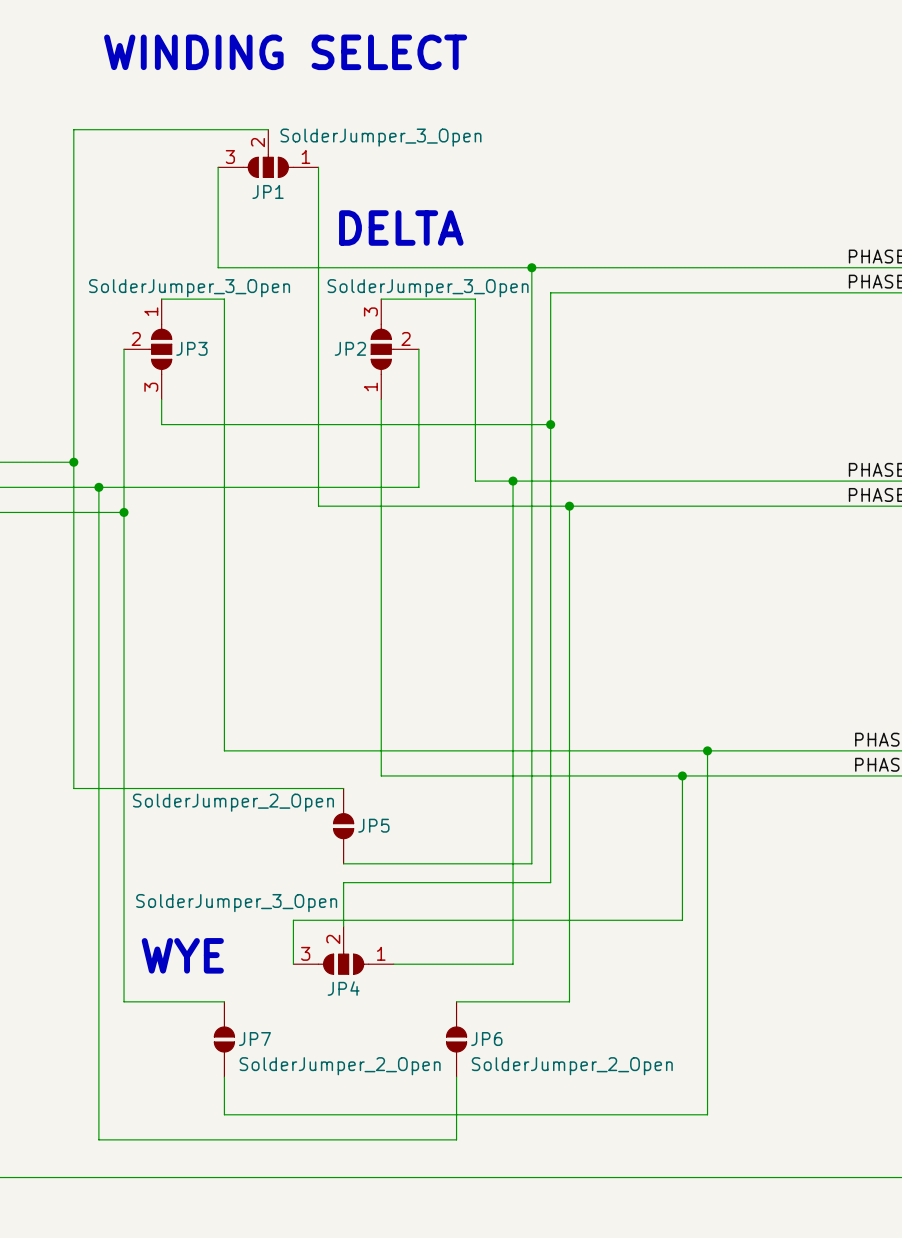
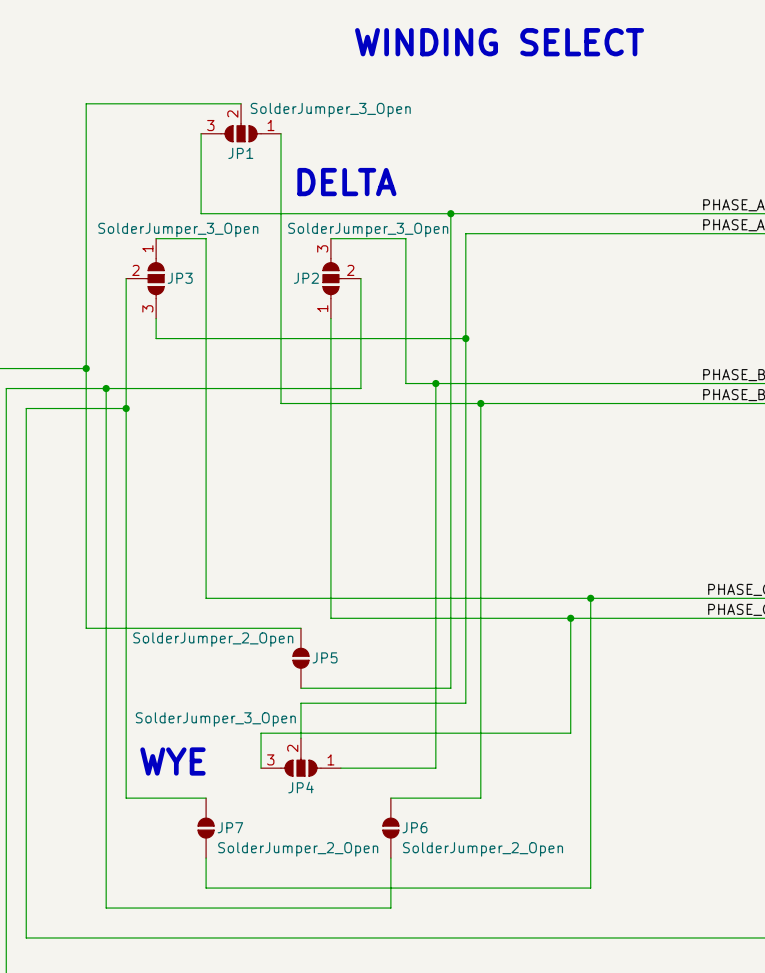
text: WINDING SELECT (285, 52) -> none
text: none -> WINDING SELECT (499, 42)

